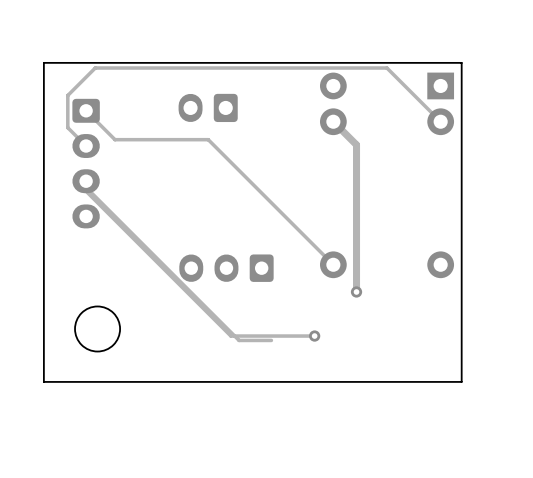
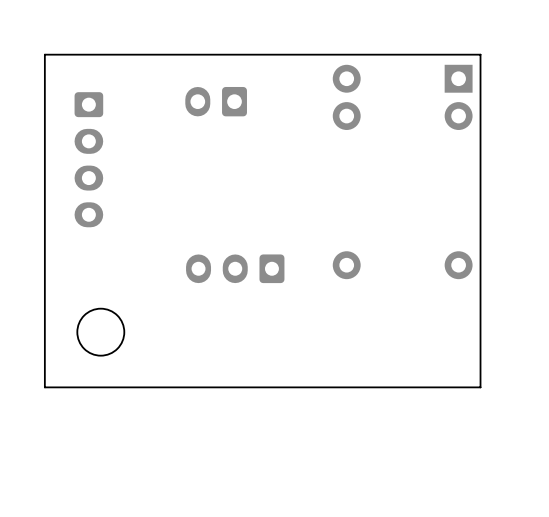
track: (86, 110) (114, 139) (208, 139) (333, 264) -> none
track: (333, 121) (356, 144) (356, 291) -> none
track: (440, 121) (386, 68) (95, 68) (67, 95) (67, 127) (86, 146) -> none
track: (86, 181) (86, 191) (230, 336) (314, 336) -> none
track: (86, 187) (239, 340) (271, 340) -> none
via: (356, 291) -> none
via: (314, 336) -> none

